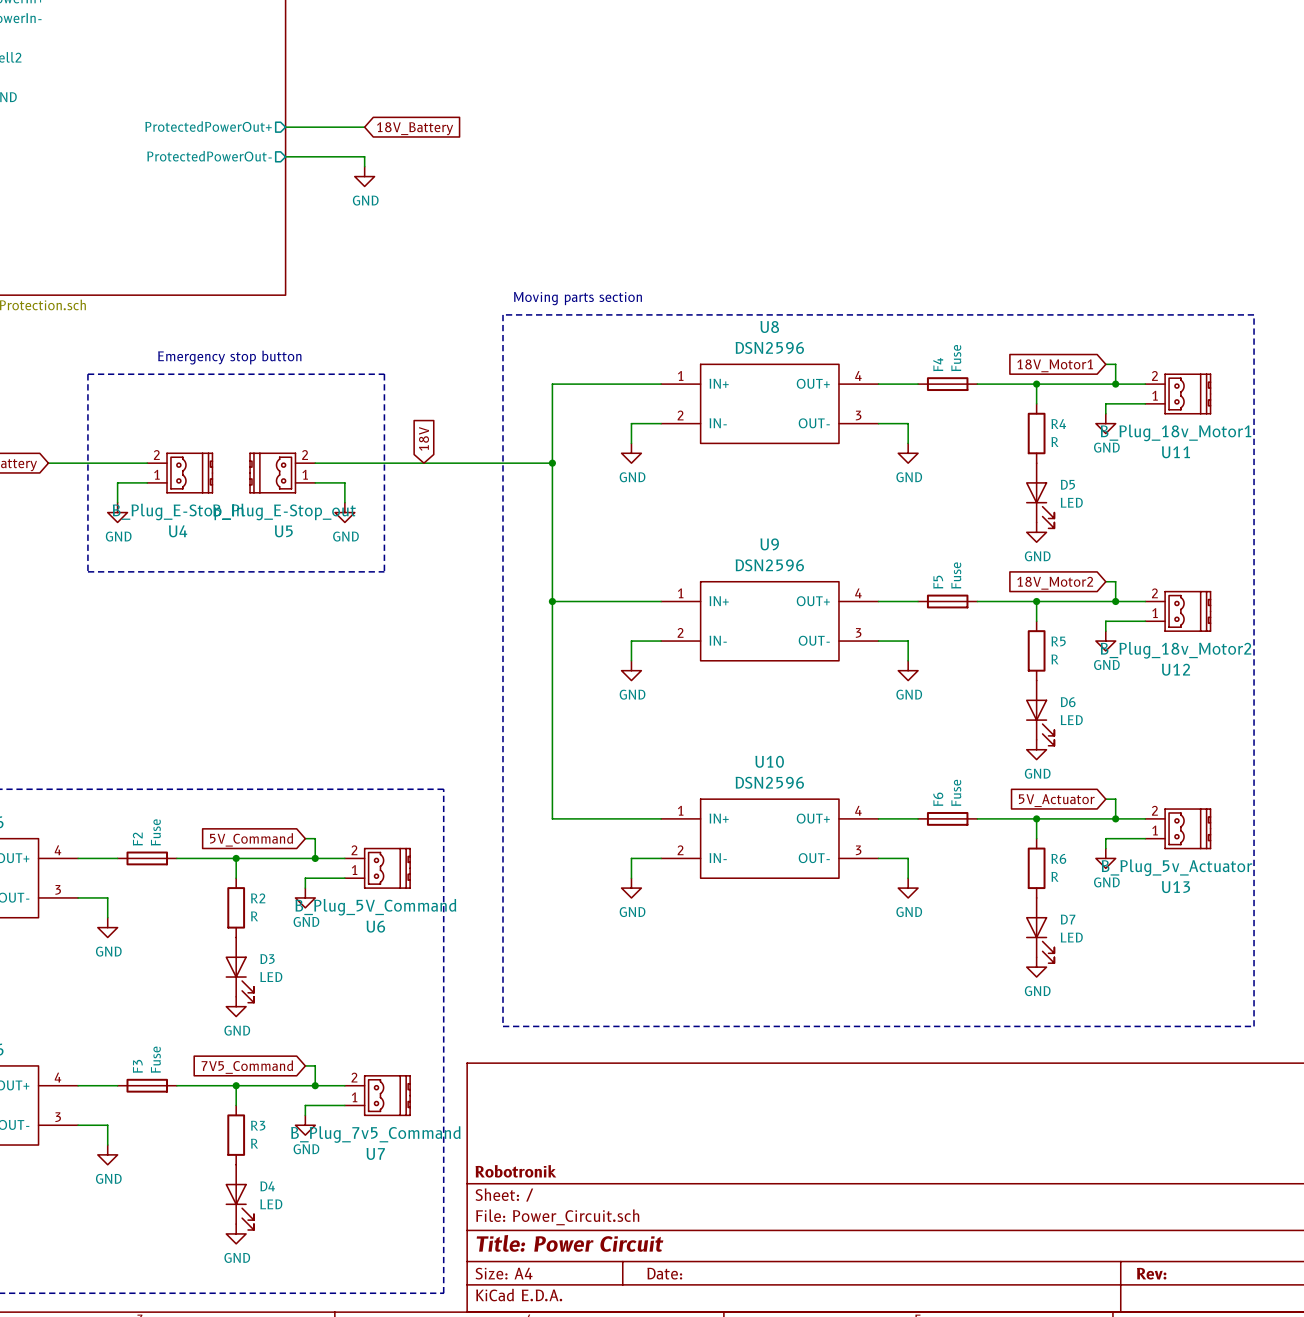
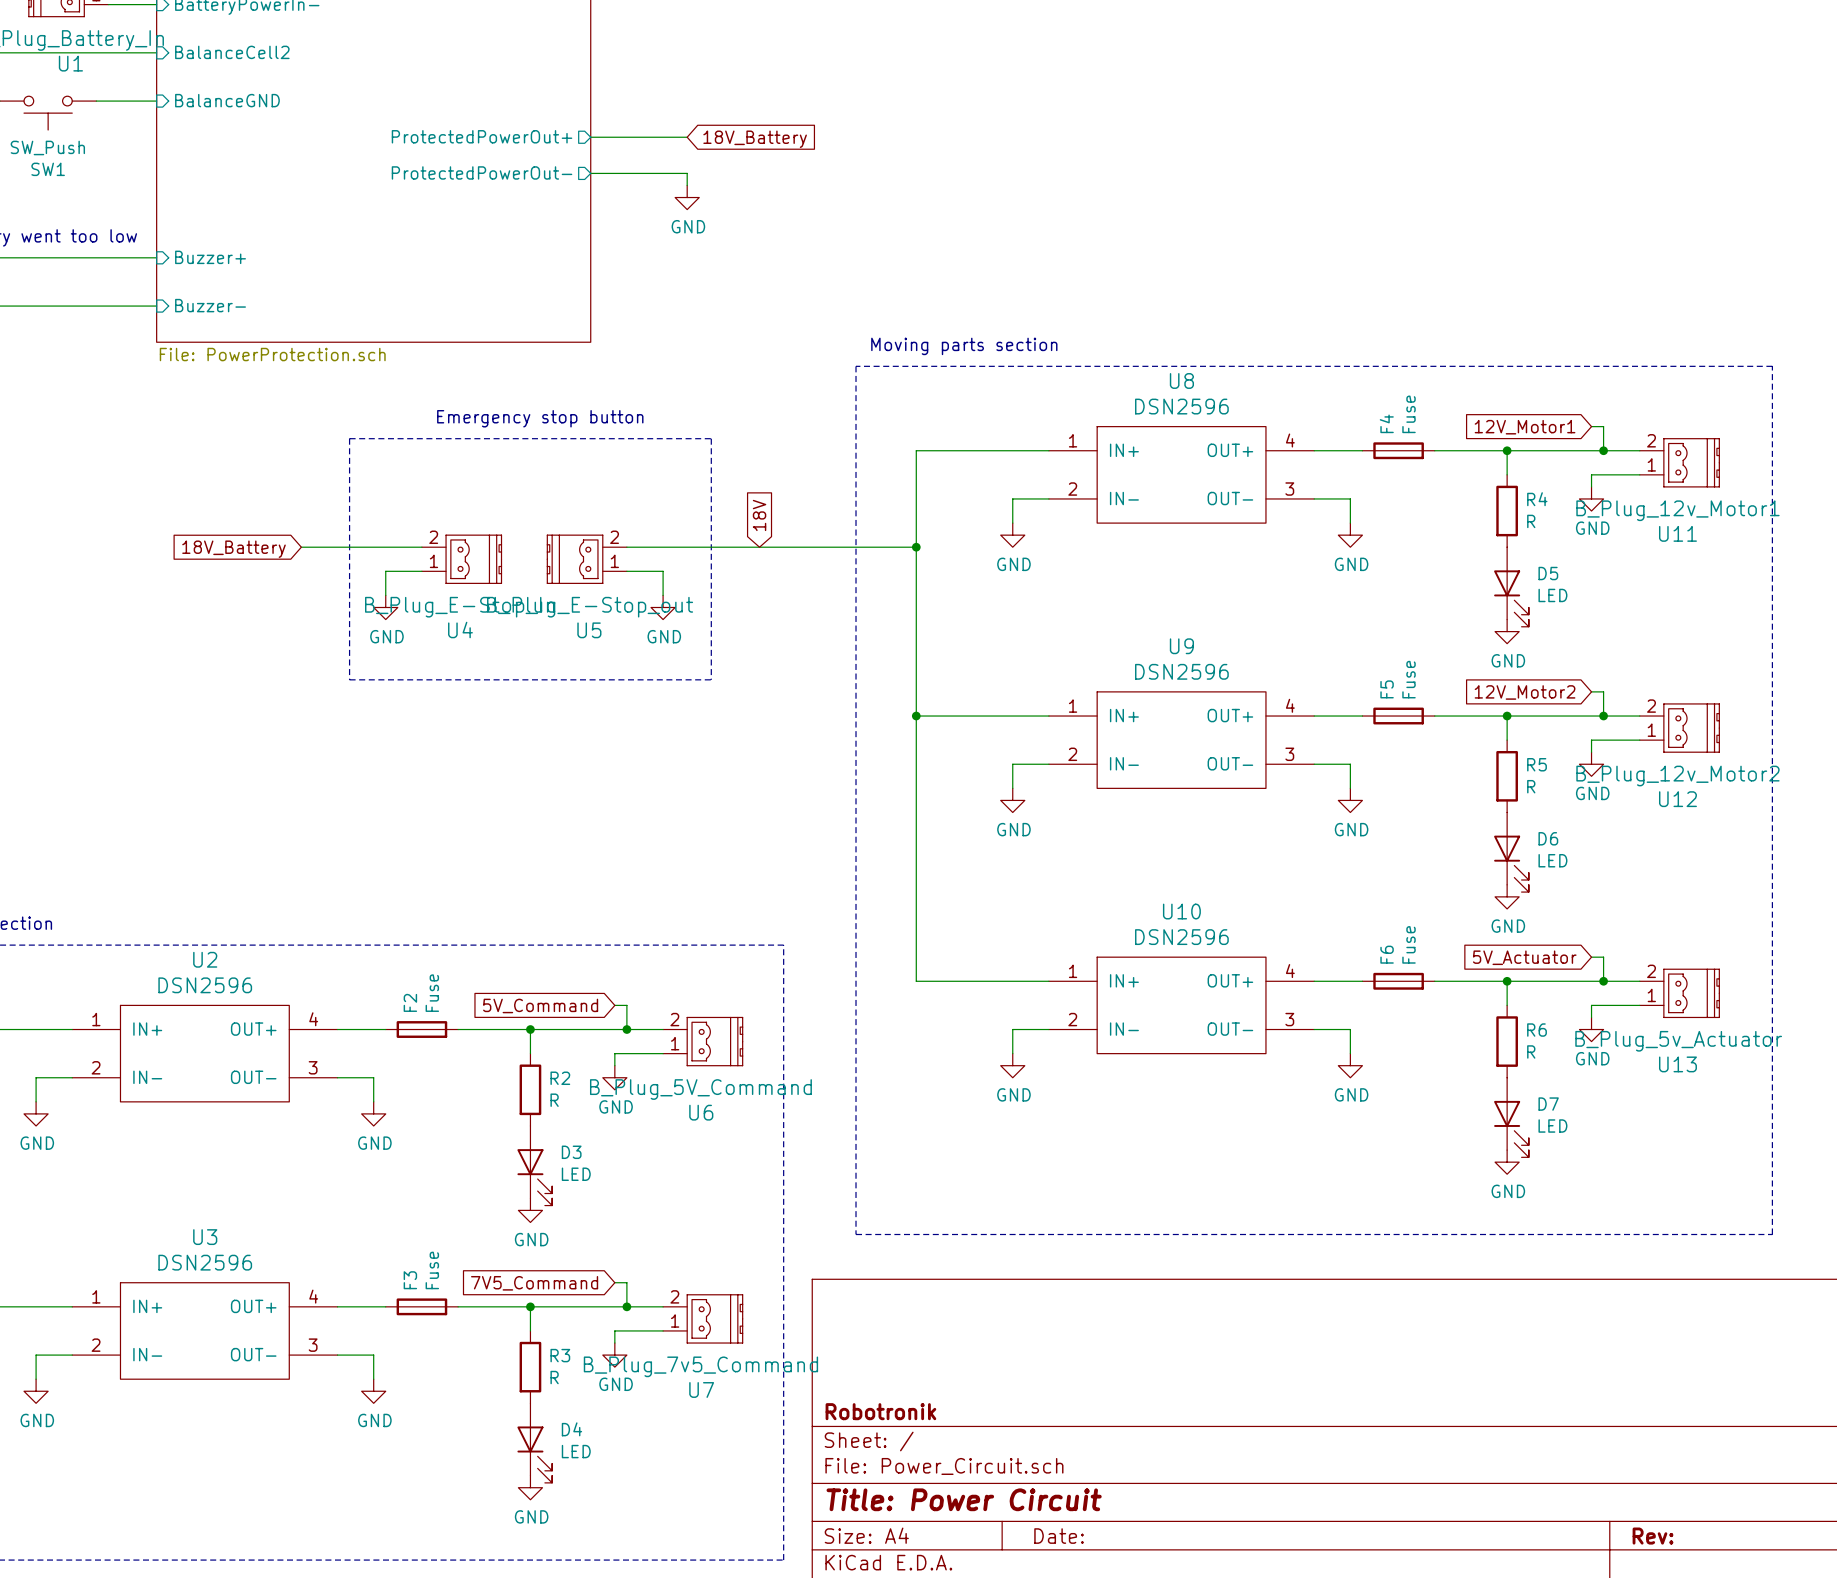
global label: 18V_Motor1 (1055, 365) -> 12V_Motor1 (1525, 427)
U11 value: B_Plug_18v_Motor1 (1176, 432) -> B_Plug_12v_Motor1 (1677, 510)
global label: 18V_Motor2 (1055, 583) -> 12V_Motor2 (1525, 692)
U12 value: B_Plug_18v_Motor2 (1176, 650) -> B_Plug_12v_Motor2 (1677, 776)

